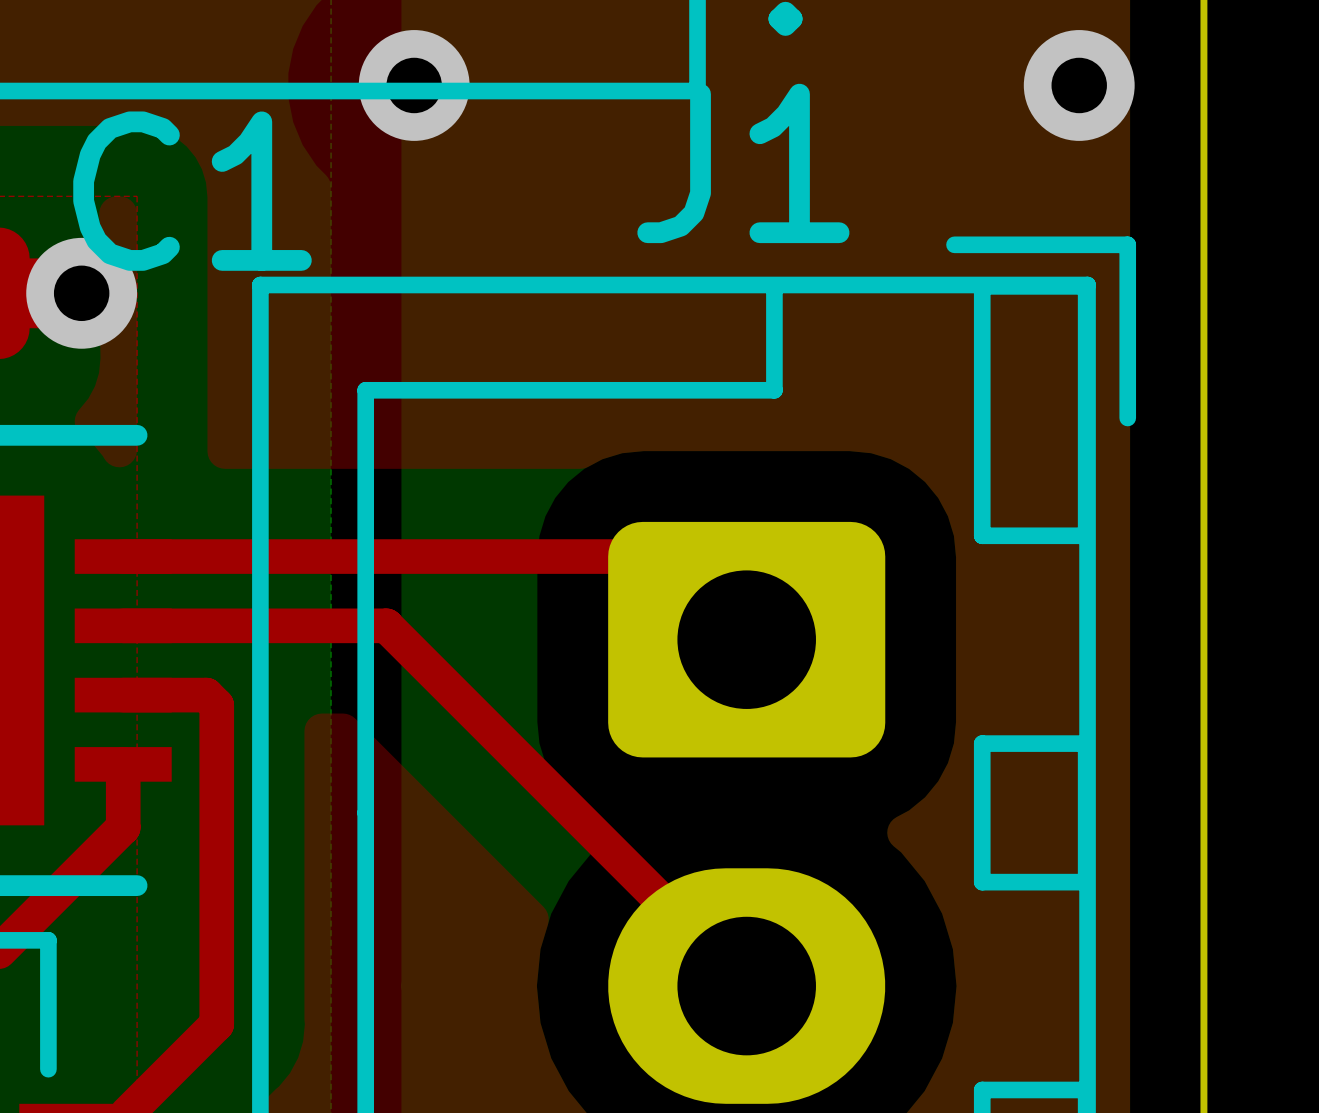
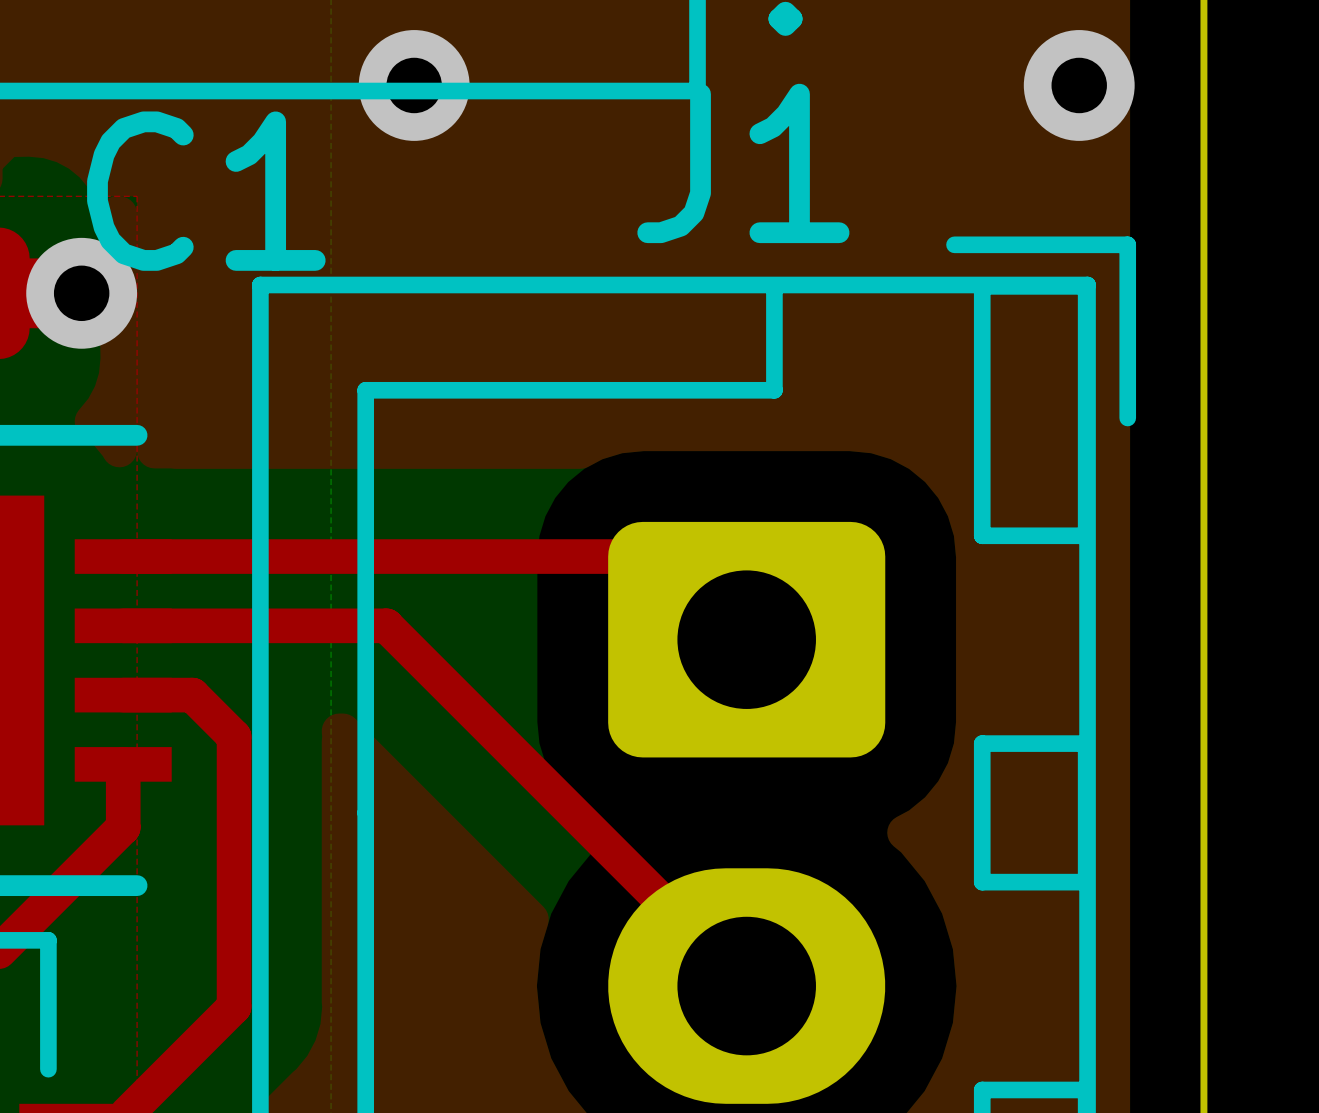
C1 name position: C1 (192, 191) -> C1 (206, 191)
top track: (192, 695) (206, 695) (216, 705) (216, 1024) -> (192, 695) (234, 736) (234, 1006) (216, 1024)

